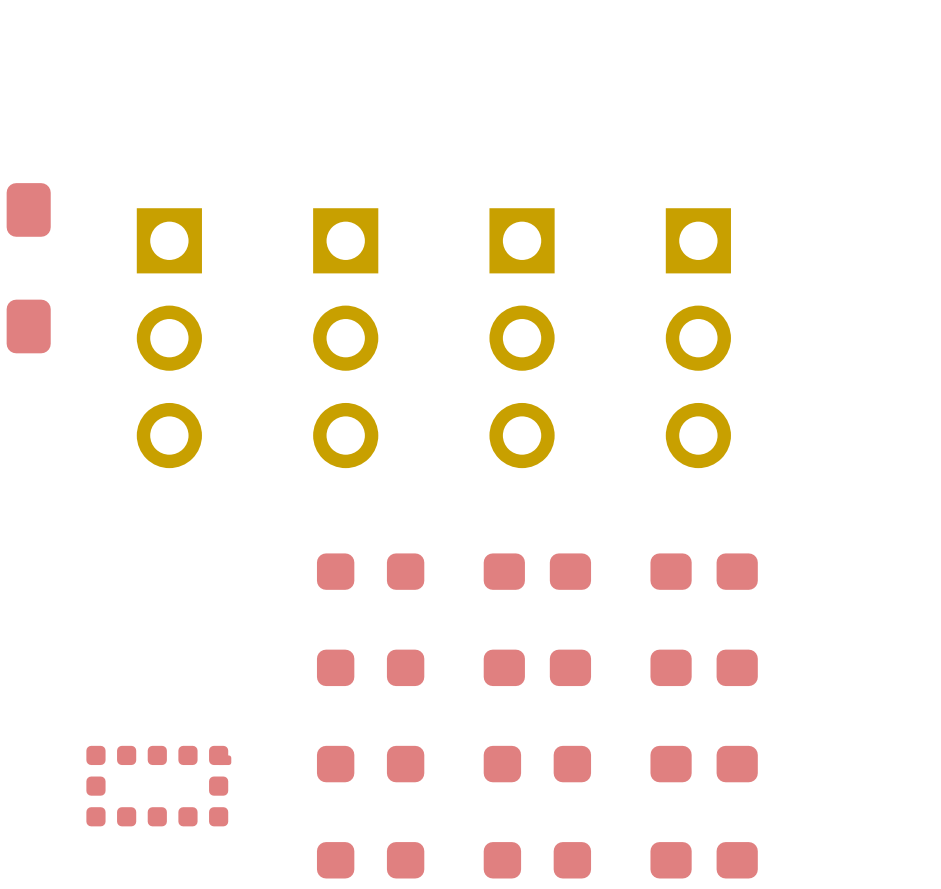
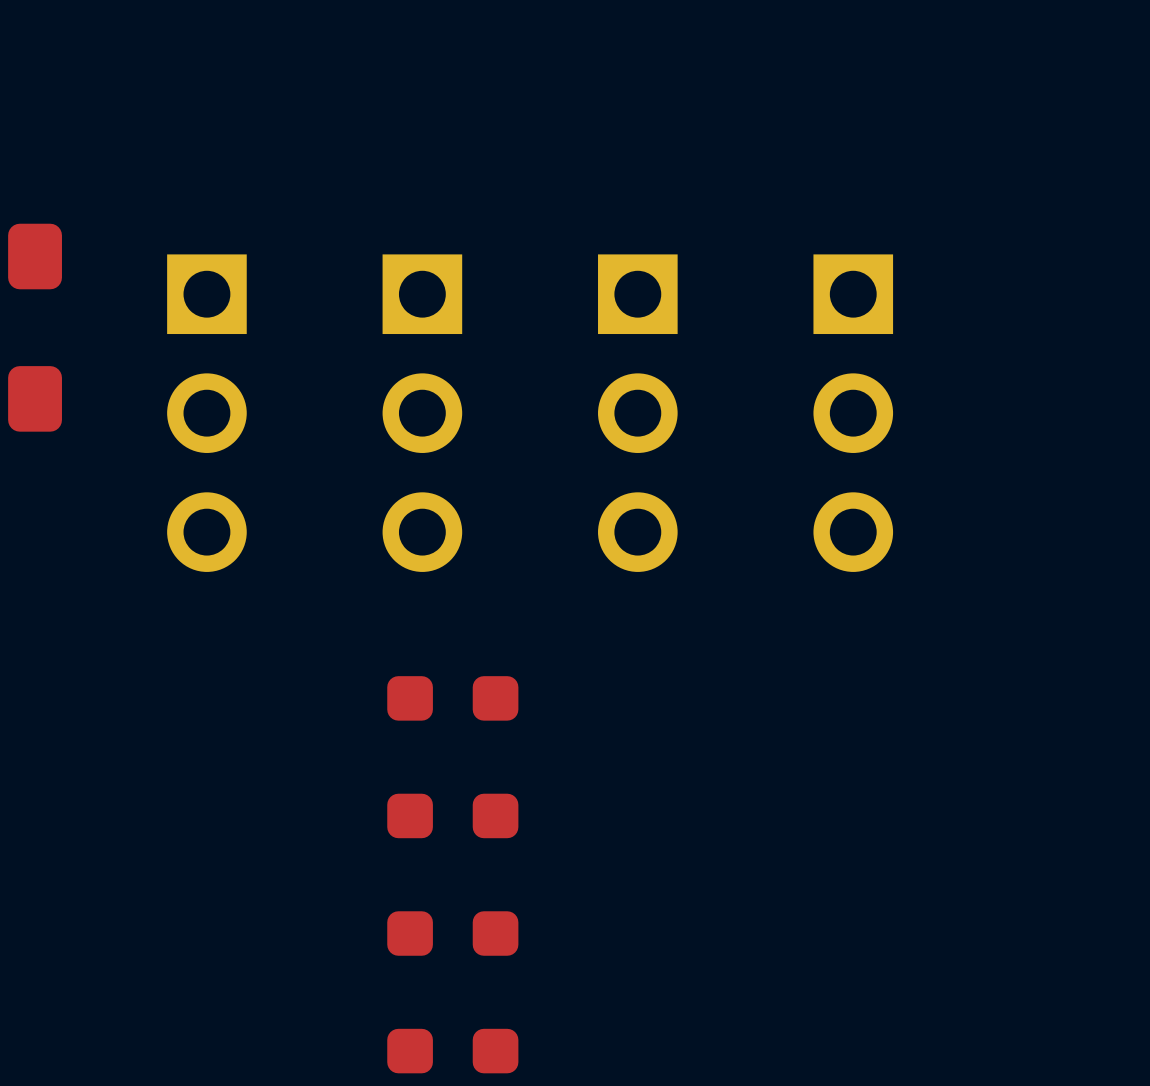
part: (537, 571) -> none
part: (704, 571) -> none
part: (537, 667) -> none
part: (704, 667) -> none
part: (537, 764) -> none
part: (704, 764) -> none
part: (158, 786) -> none
part: (537, 860) -> none
part: (704, 860) -> none

